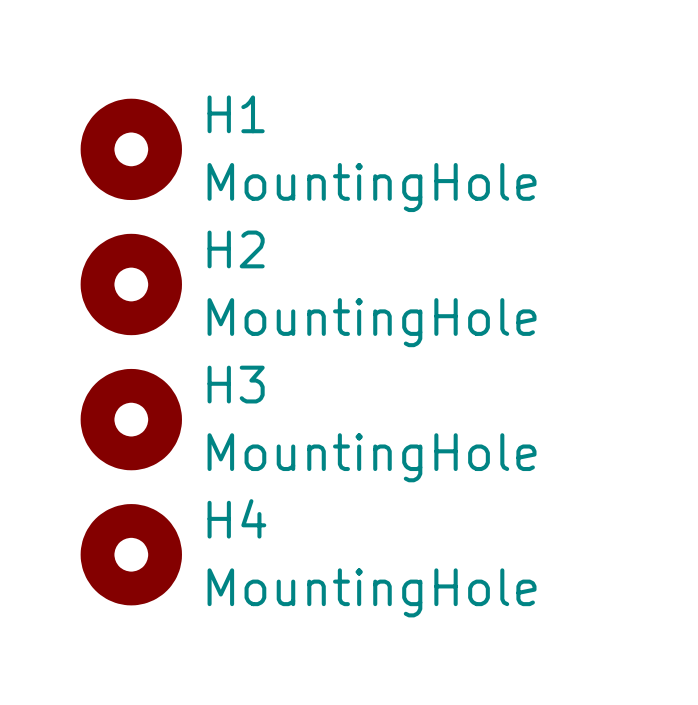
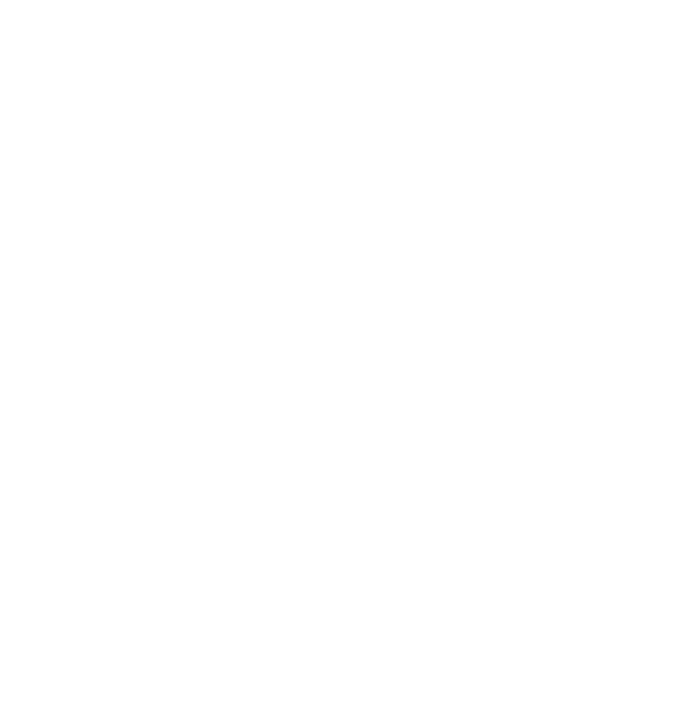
H1: MountingHole (131, 149) -> none
H2: MountingHole (131, 284) -> none
H3: MountingHole (131, 419) -> none
H4: MountingHole (131, 554) -> none

